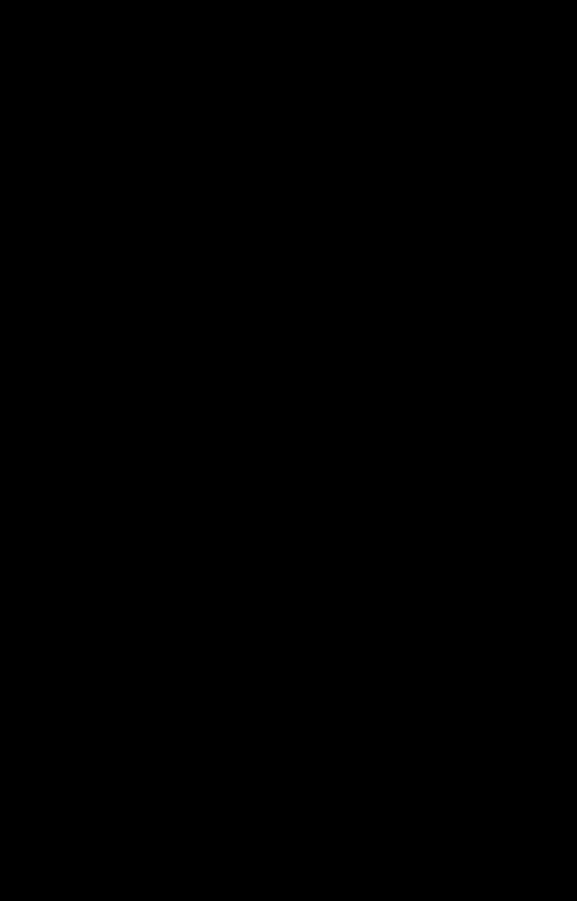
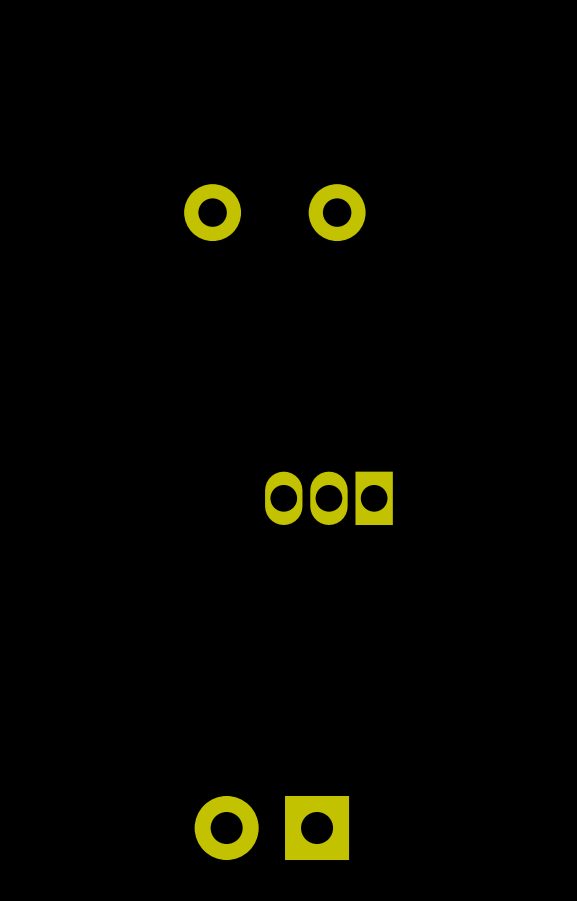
part: none -> (274, 212)
part: none -> (328, 498)
part: none -> (271, 828)

